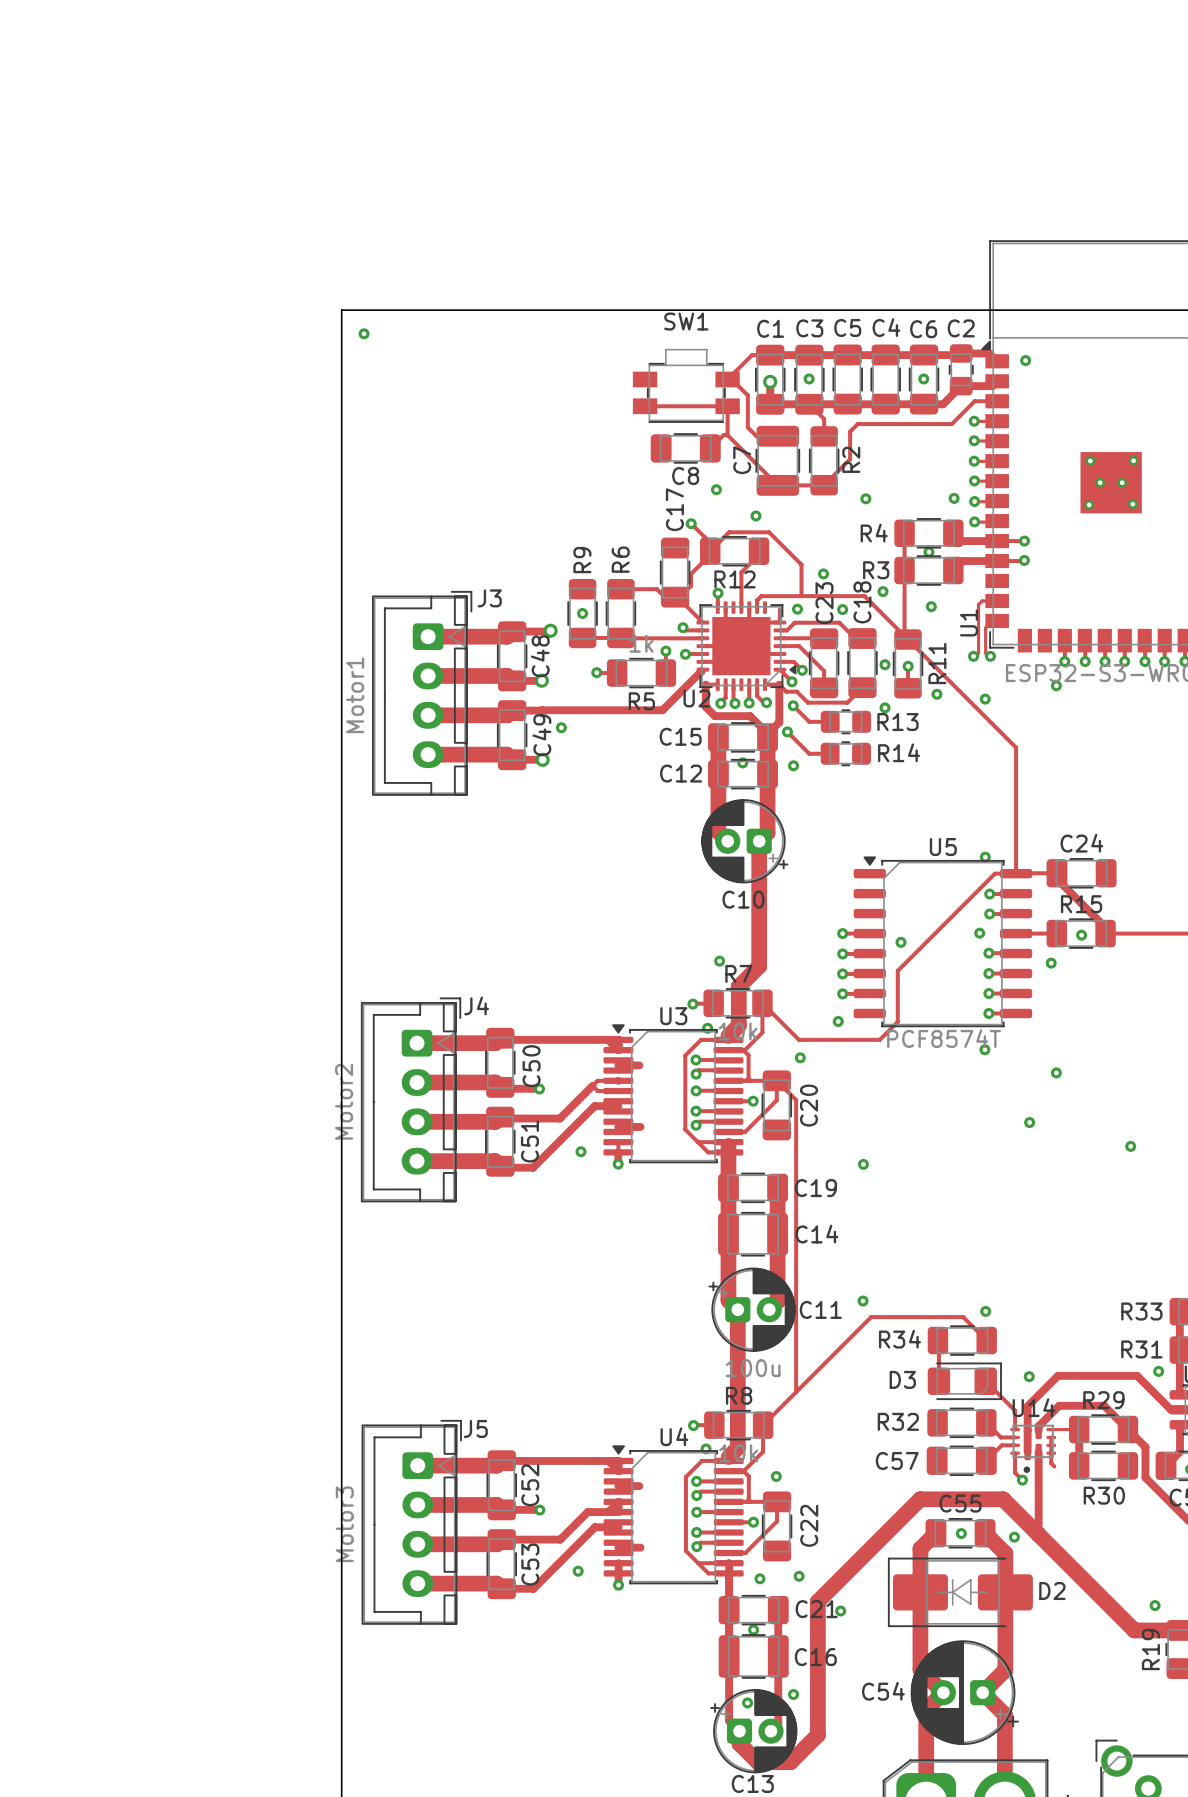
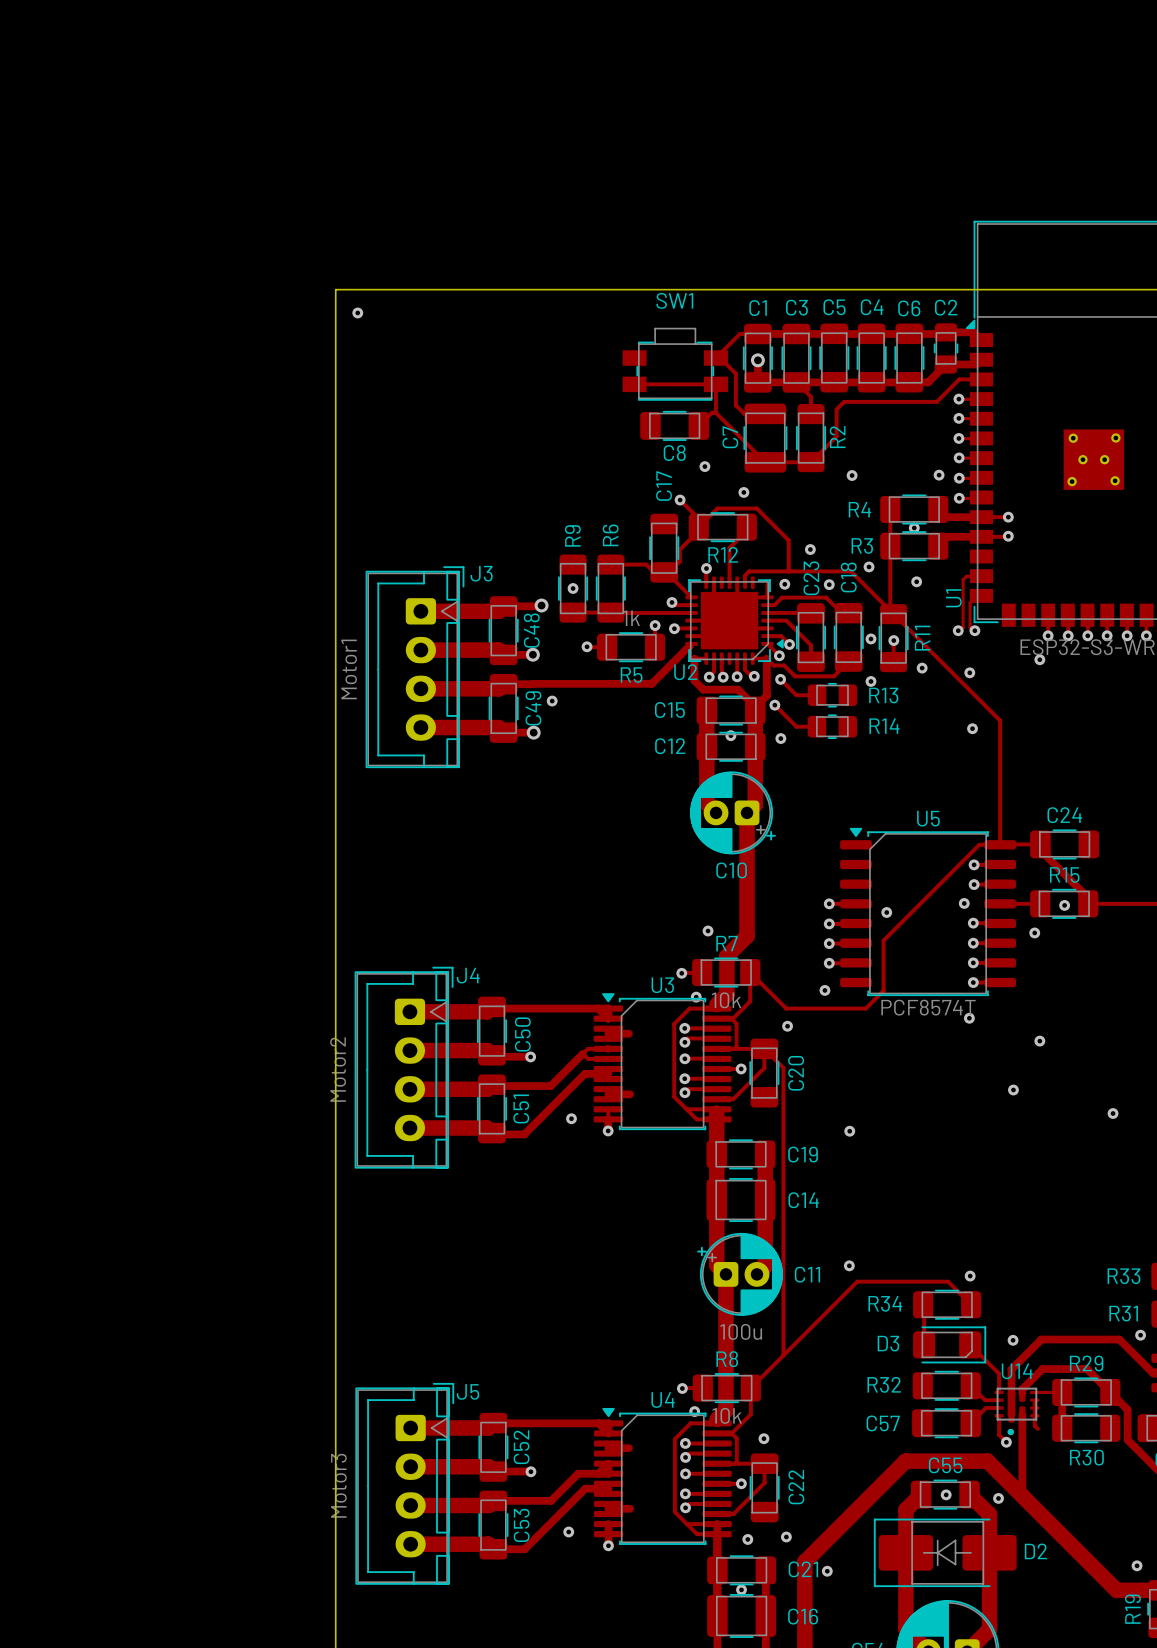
via: (1025, 360) -> none
via: (809, 378) -> none
via: (923, 378) -> none
via: none -> (972, 728)
via: (985, 857) -> none

